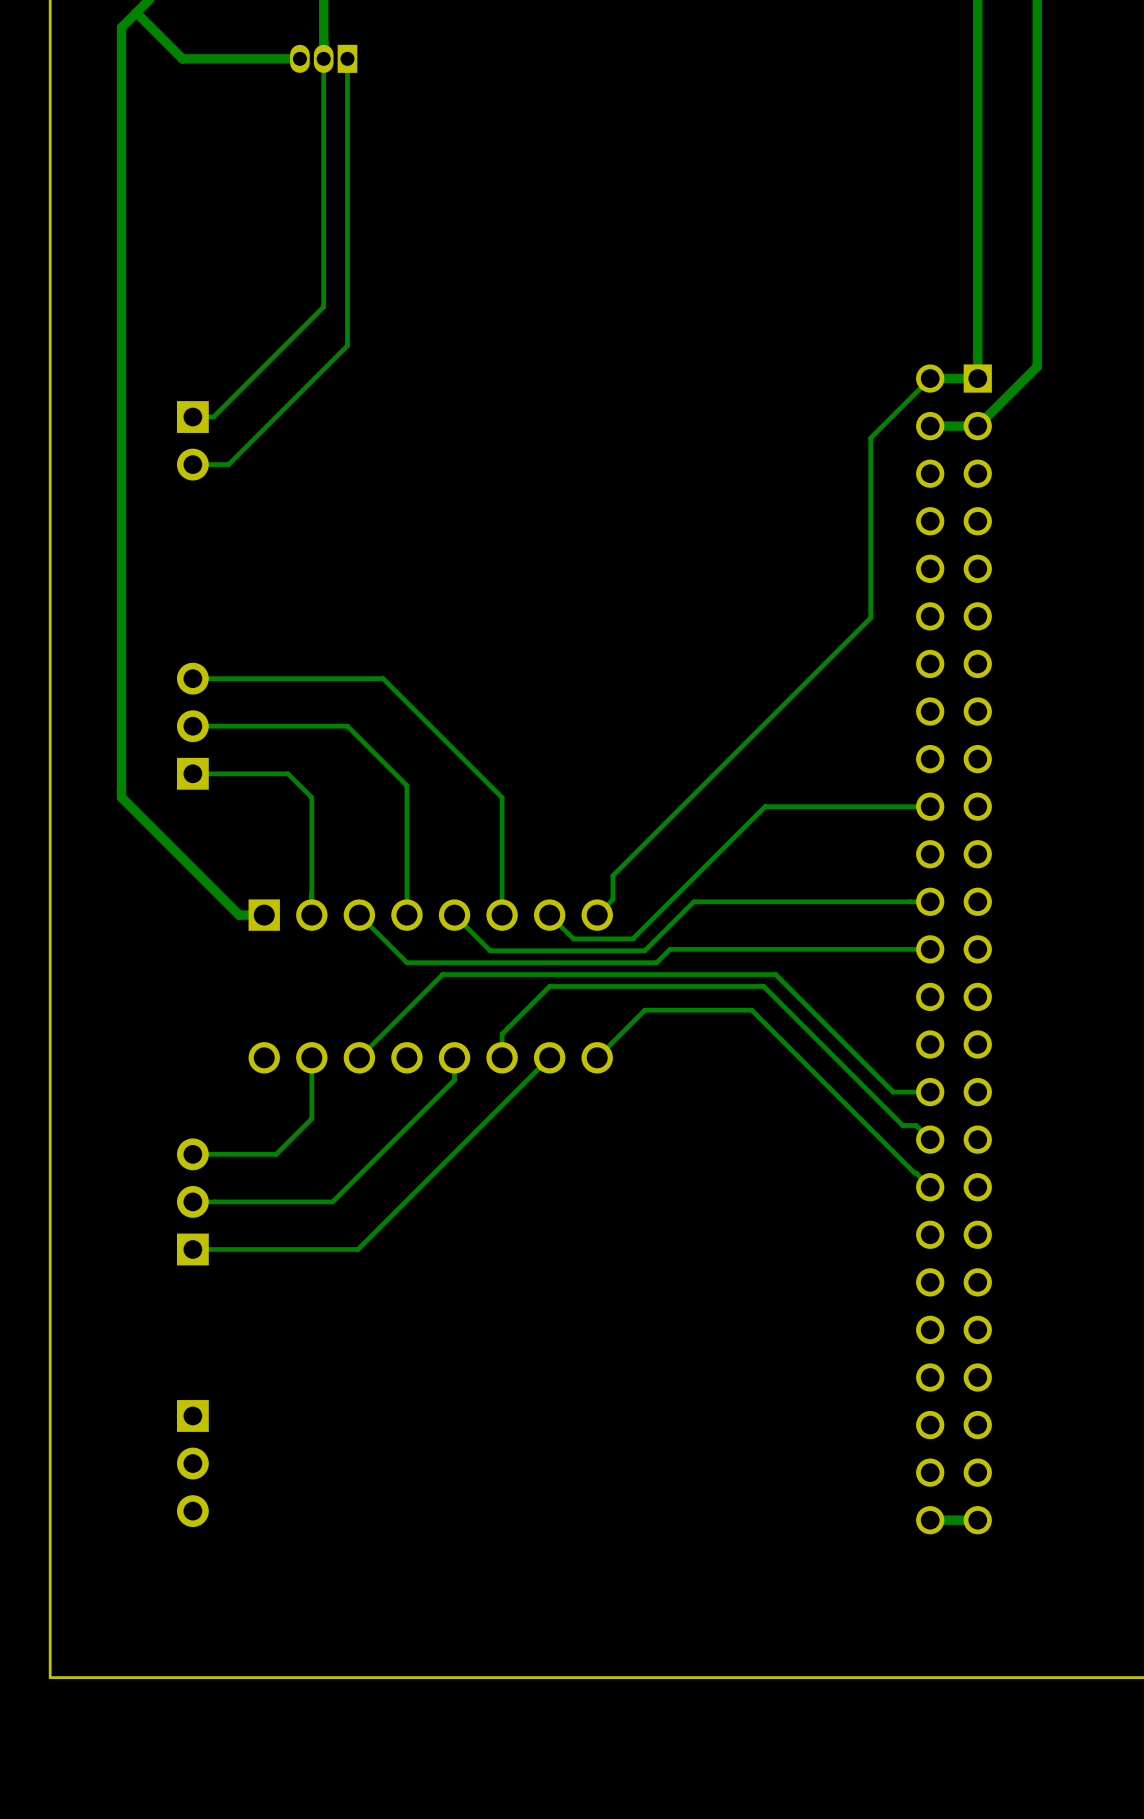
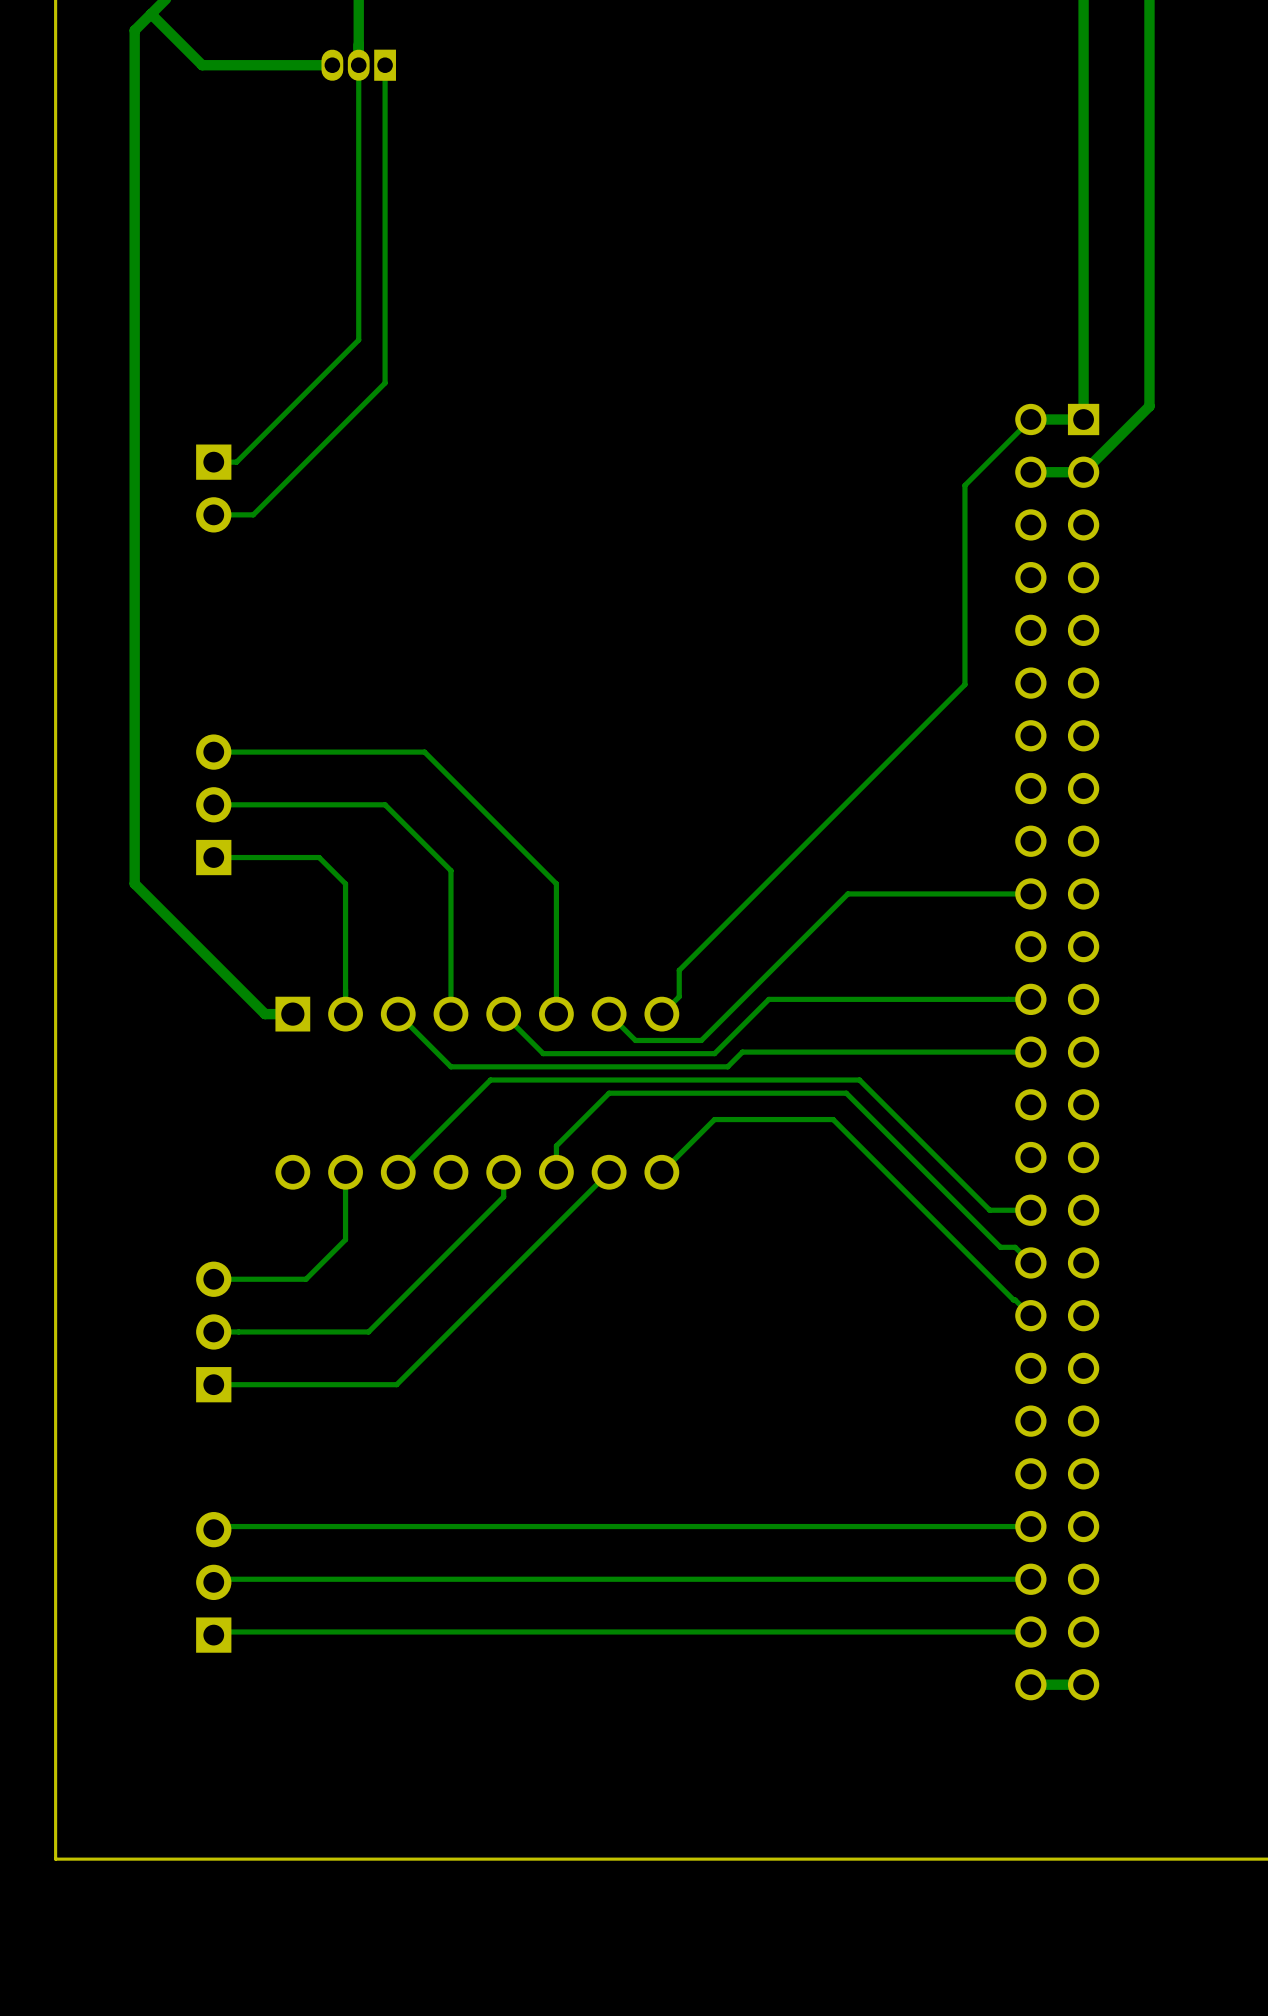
track: none -> (1030, 1526) (216, 1526) (213, 1529)
track: none -> (1030, 1579) (216, 1579) (213, 1582)
part rotation: 0° (192, 1463) -> 180° (213, 1582)
track: none -> (1030, 1631) (216, 1631) (213, 1635)

